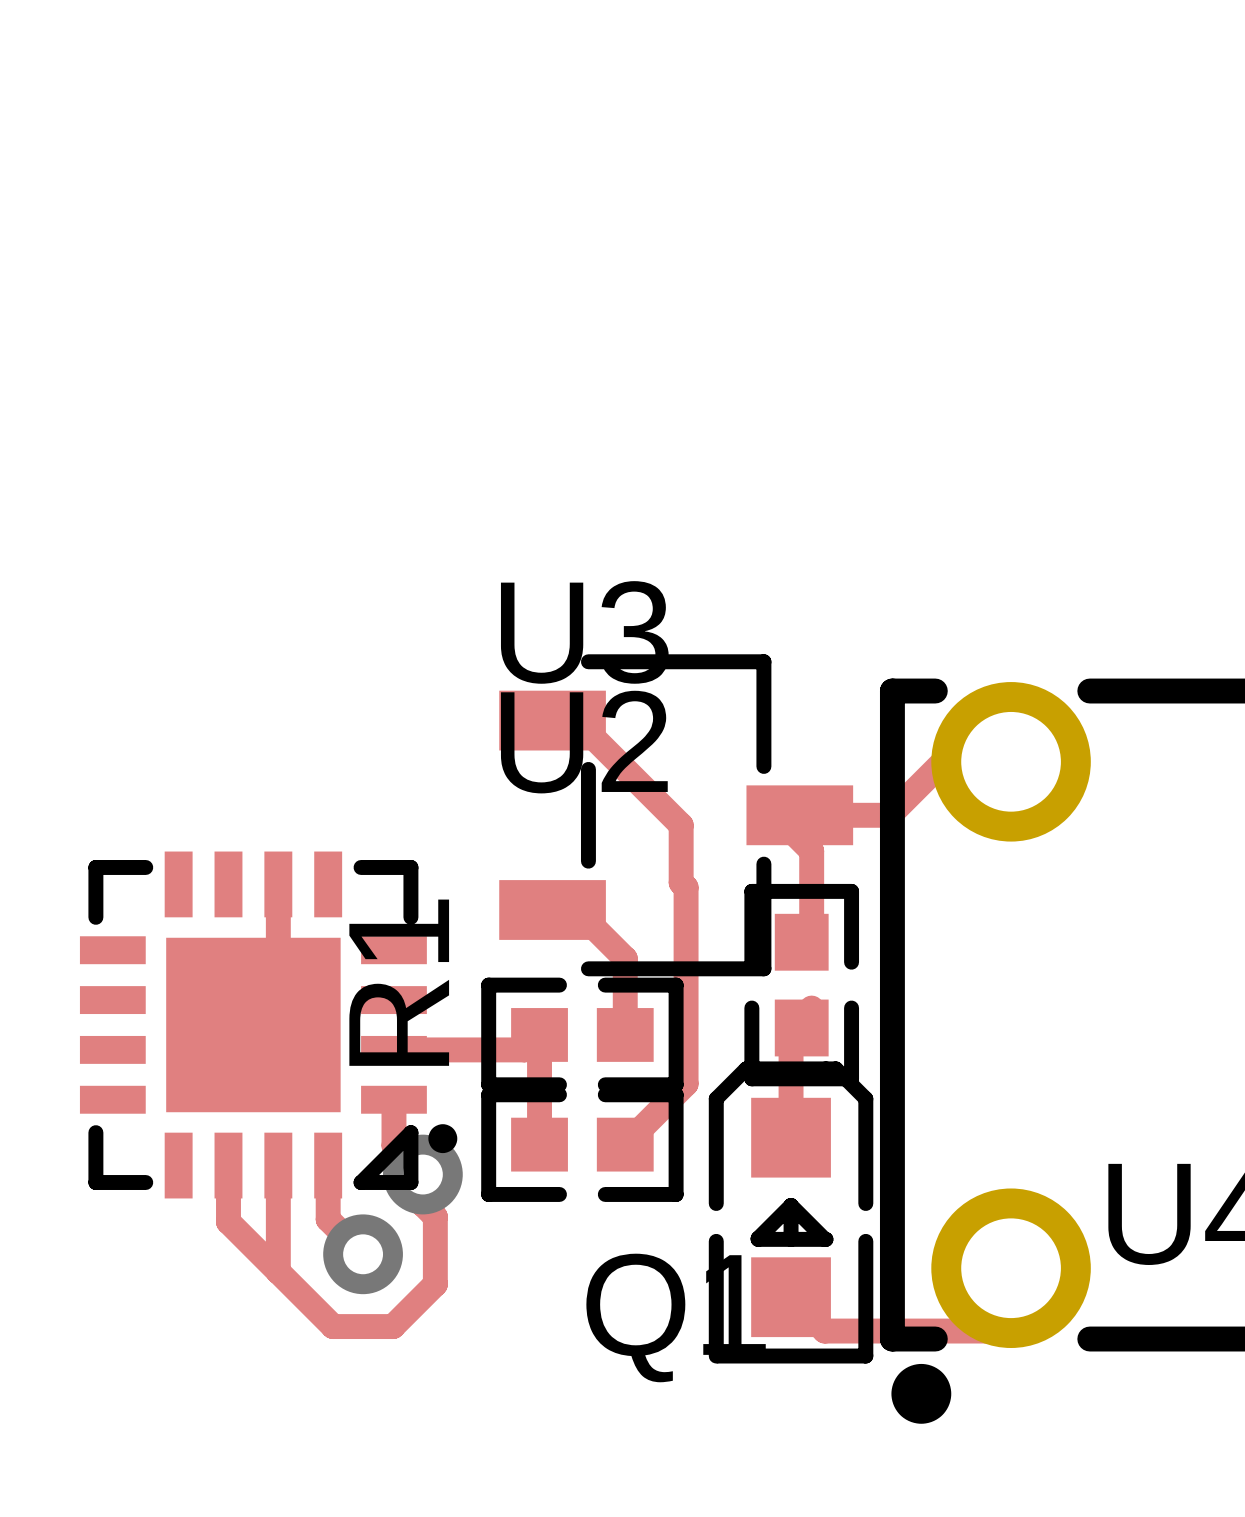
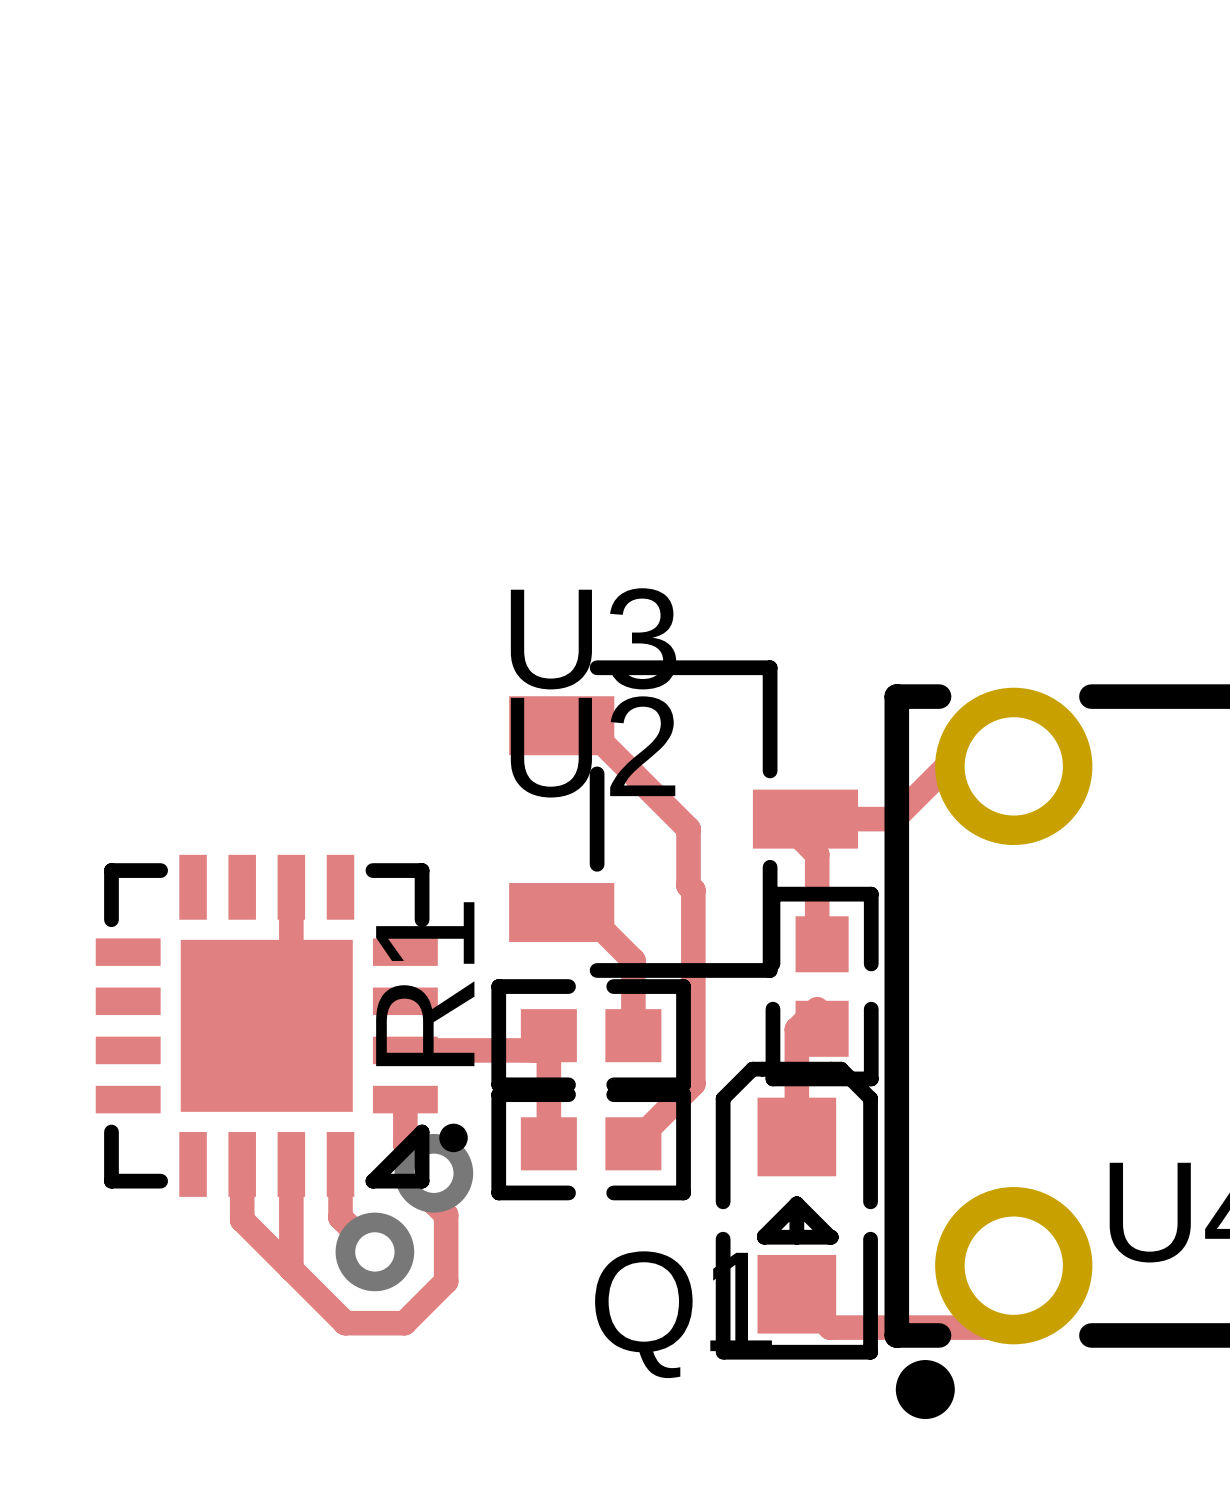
R1 position: (801, 985) -> (822, 986)

